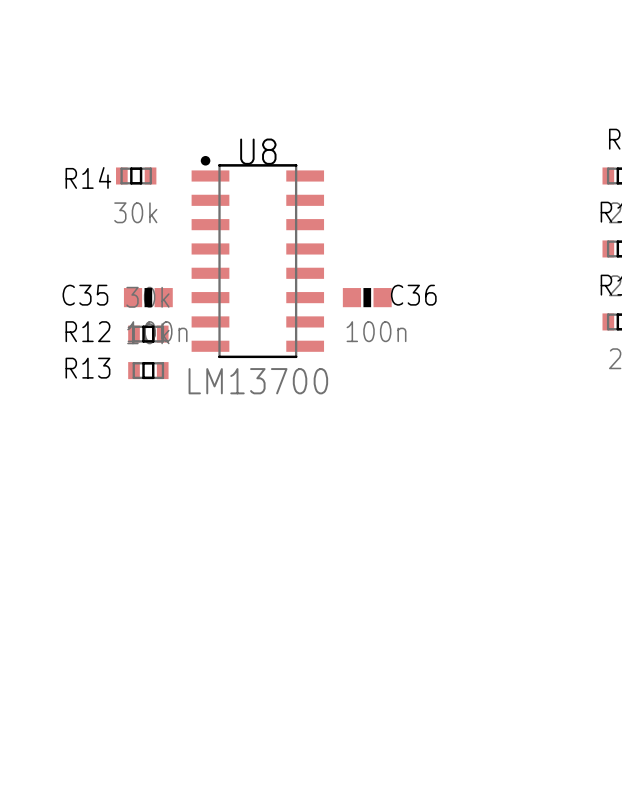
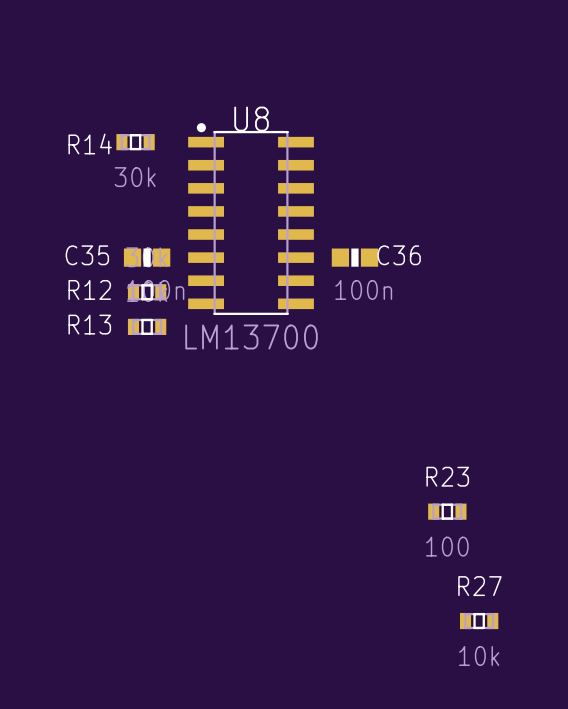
R23: none -> 100 (447, 511)
R27: none -> 10k (479, 621)

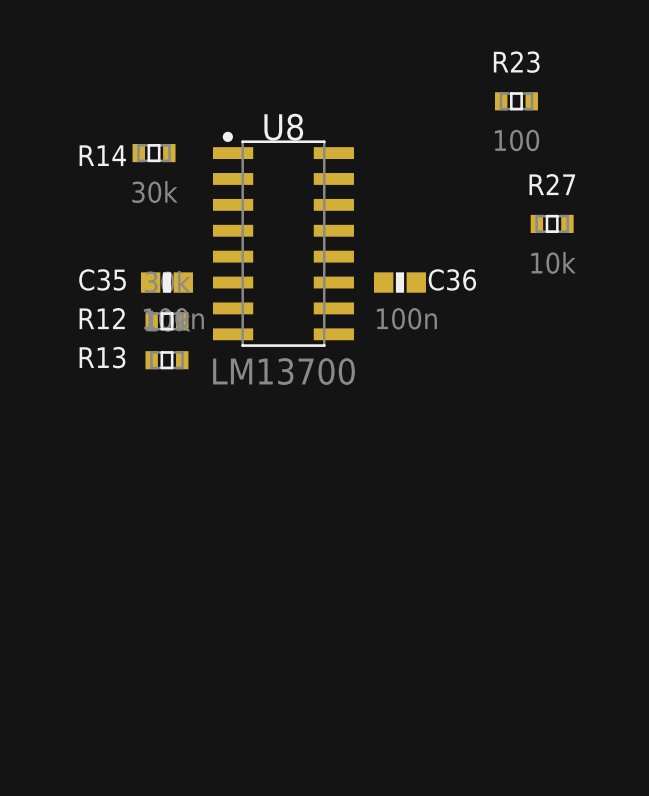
R23 position: (447, 511) -> (516, 101)
R27 position: (479, 621) -> (552, 223)

